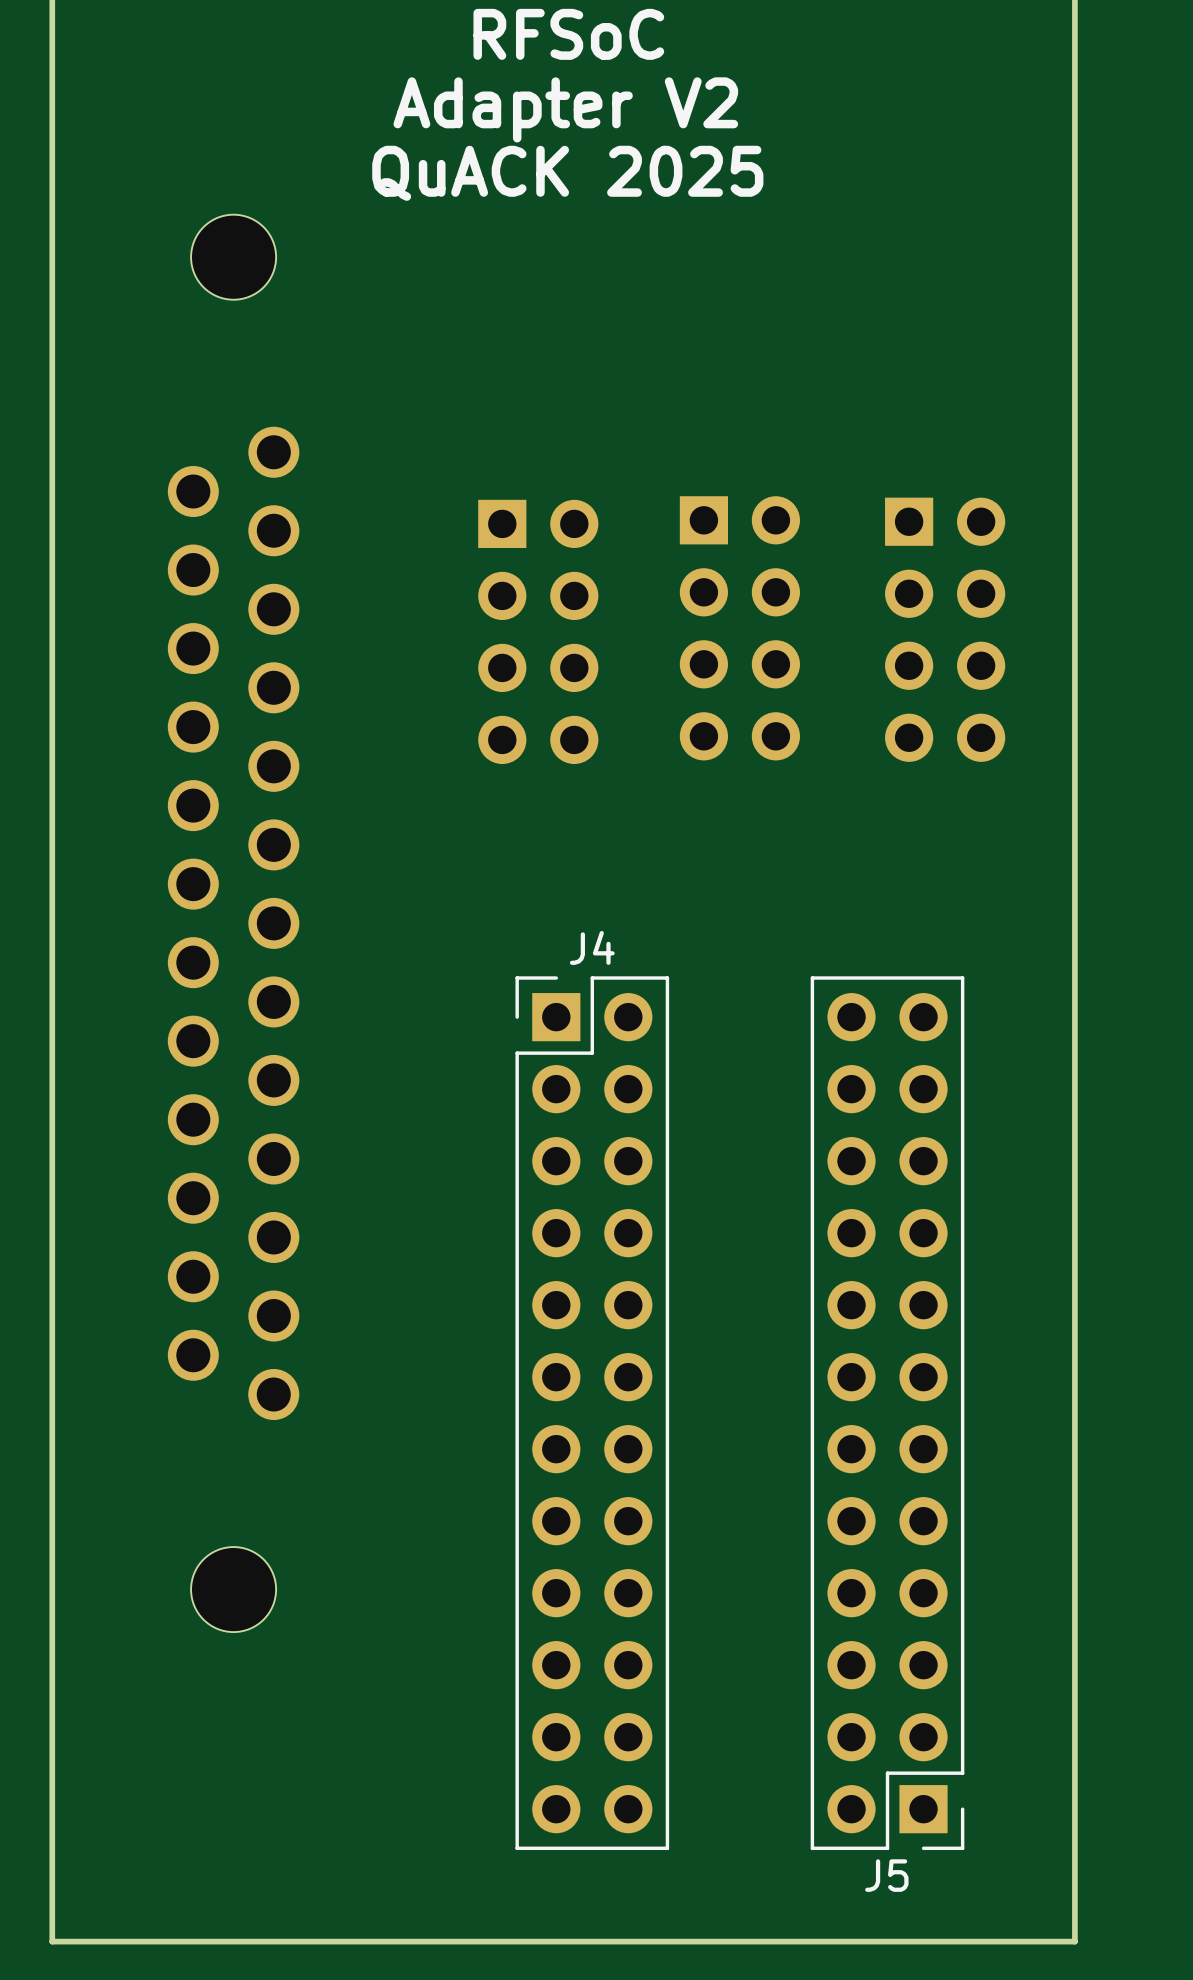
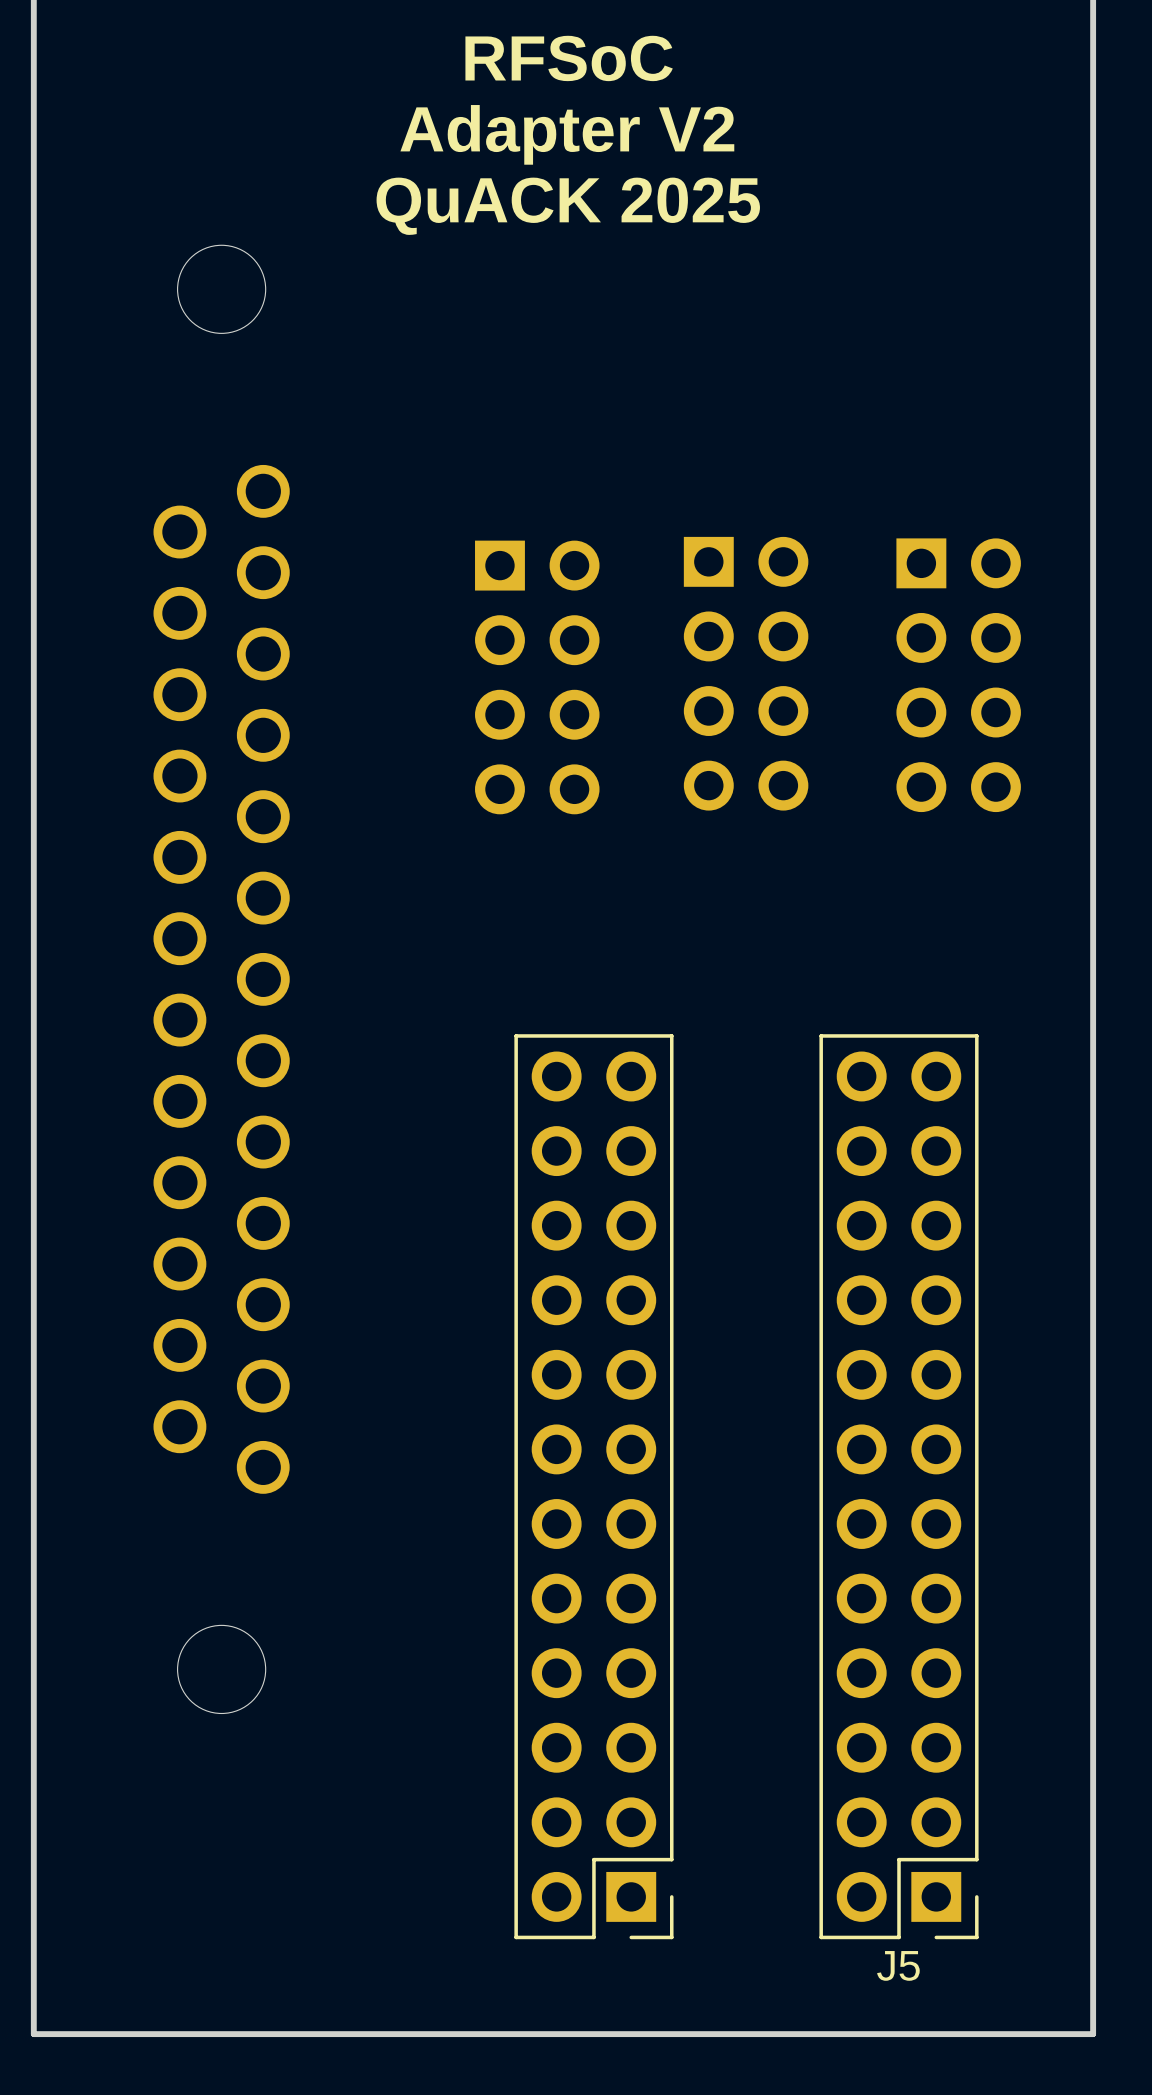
J4: (592, 1413) -> none
part: none -> (593, 1486)

